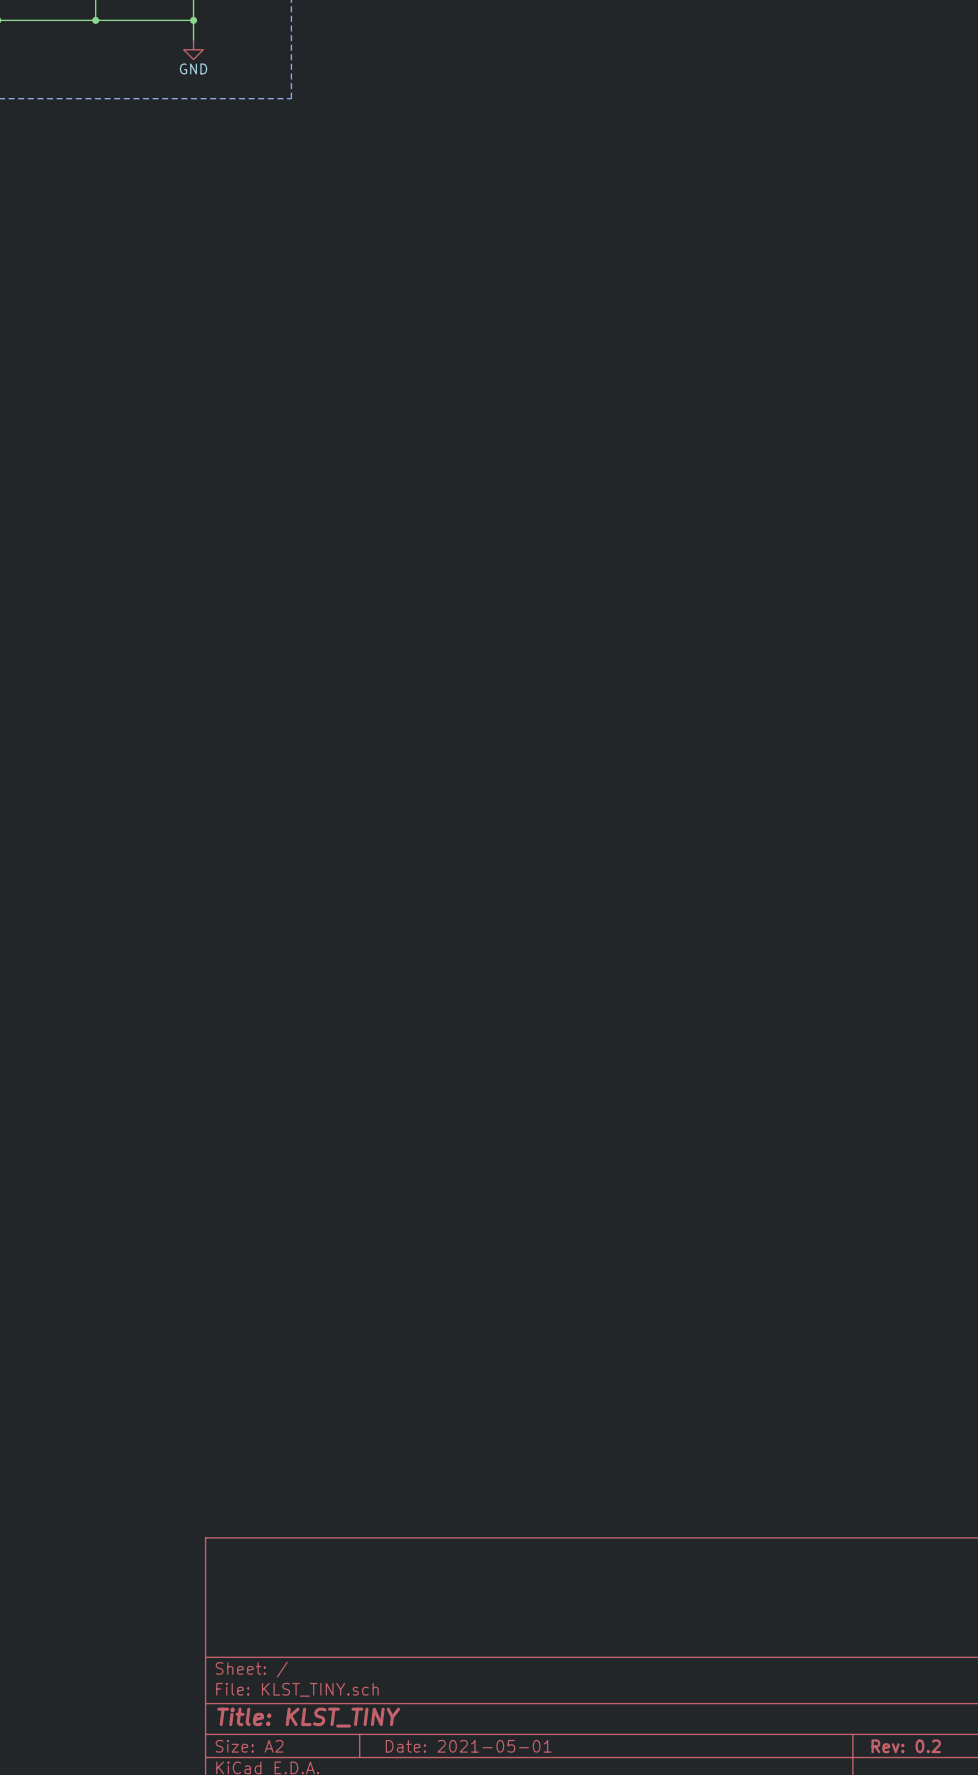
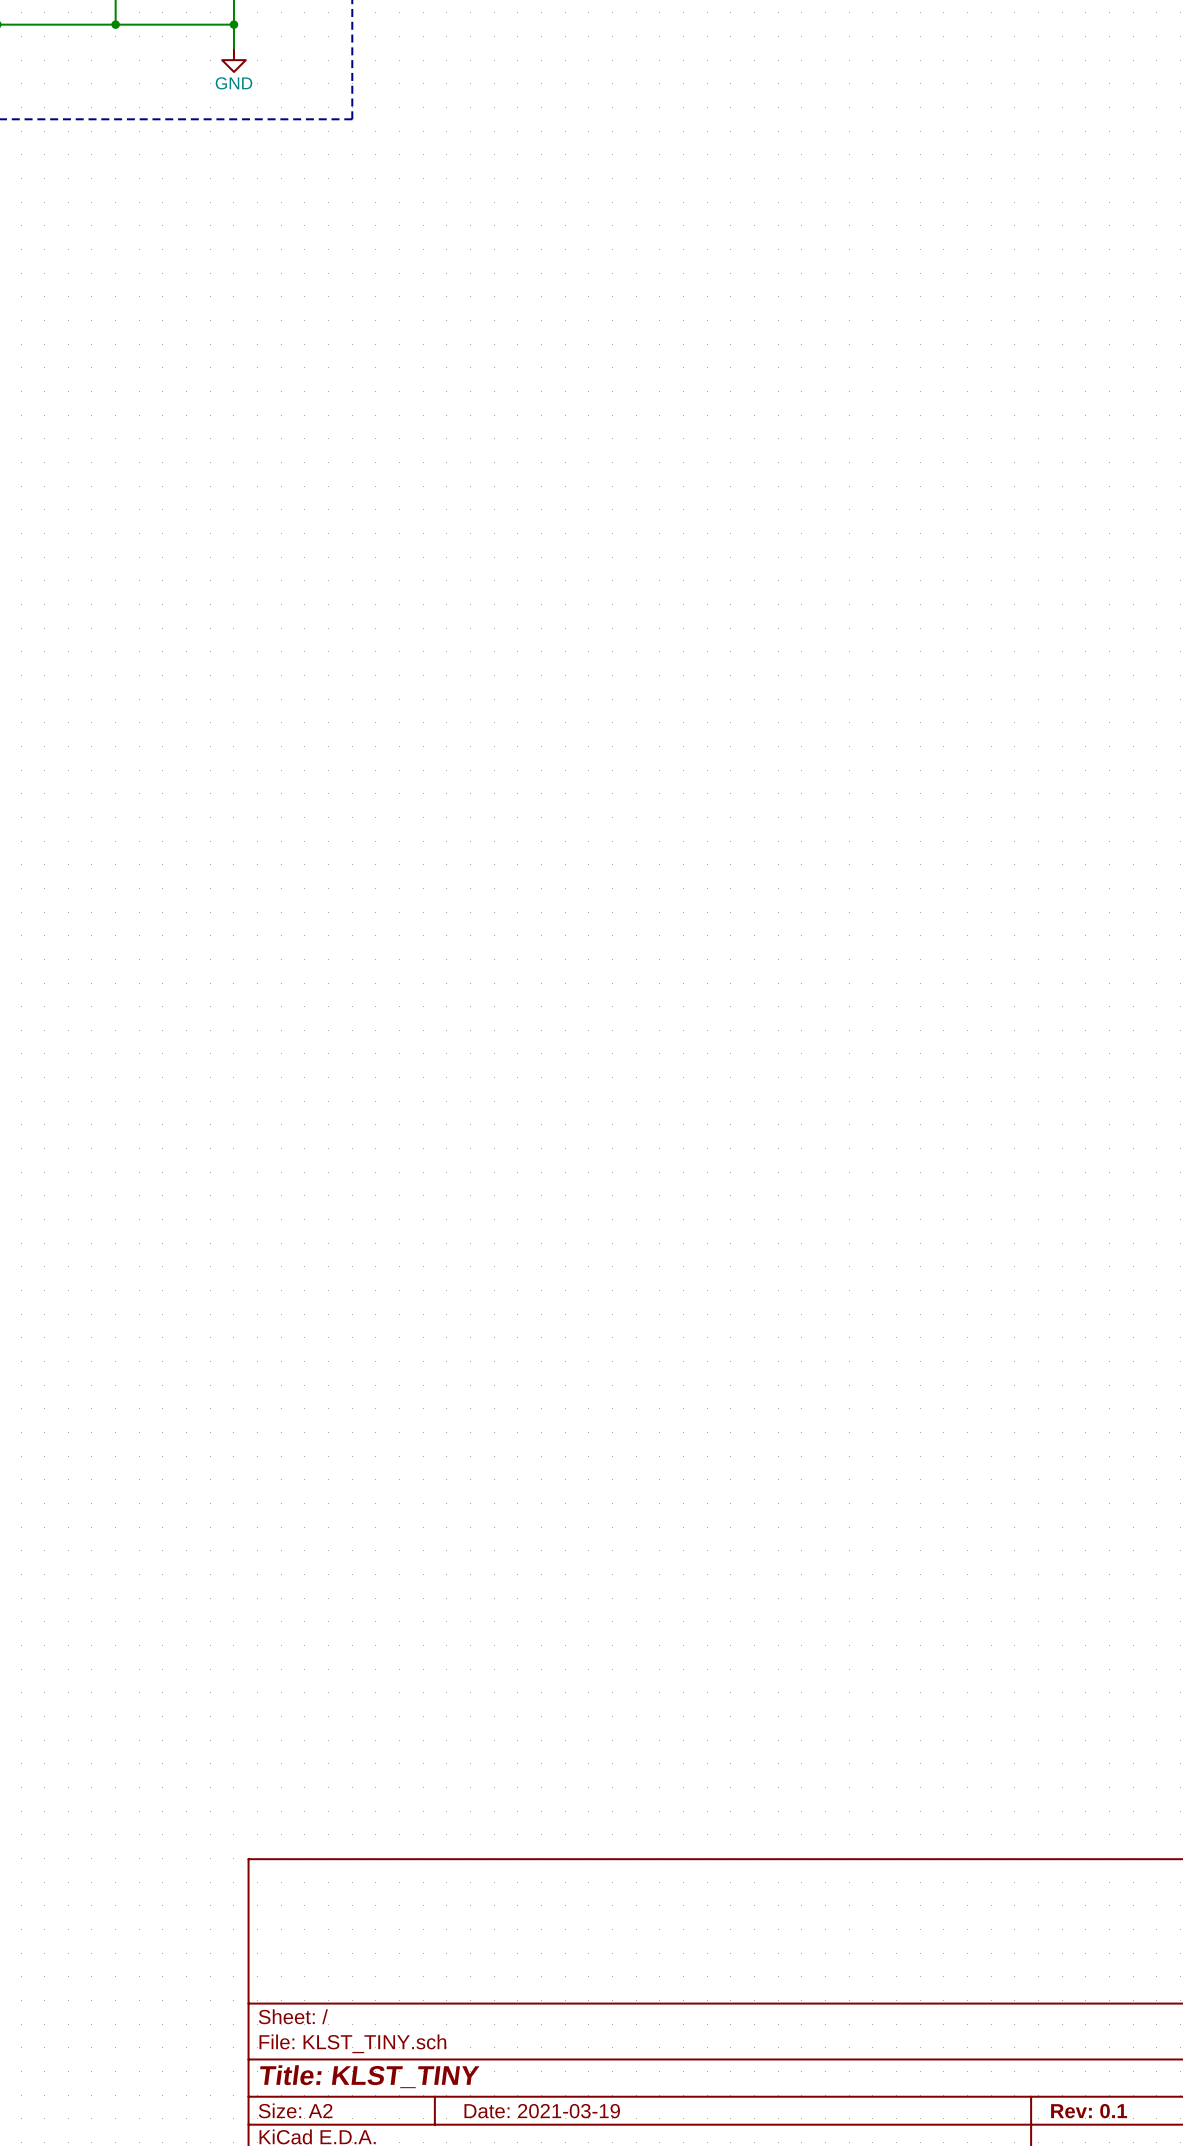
title block: Date: 2021-05-01 (468, 1746) -> Date: 2021-03-19 (542, 2111)
title block: Rev: 0.2 (906, 1746) -> Rev: 0.1 (1089, 2111)

